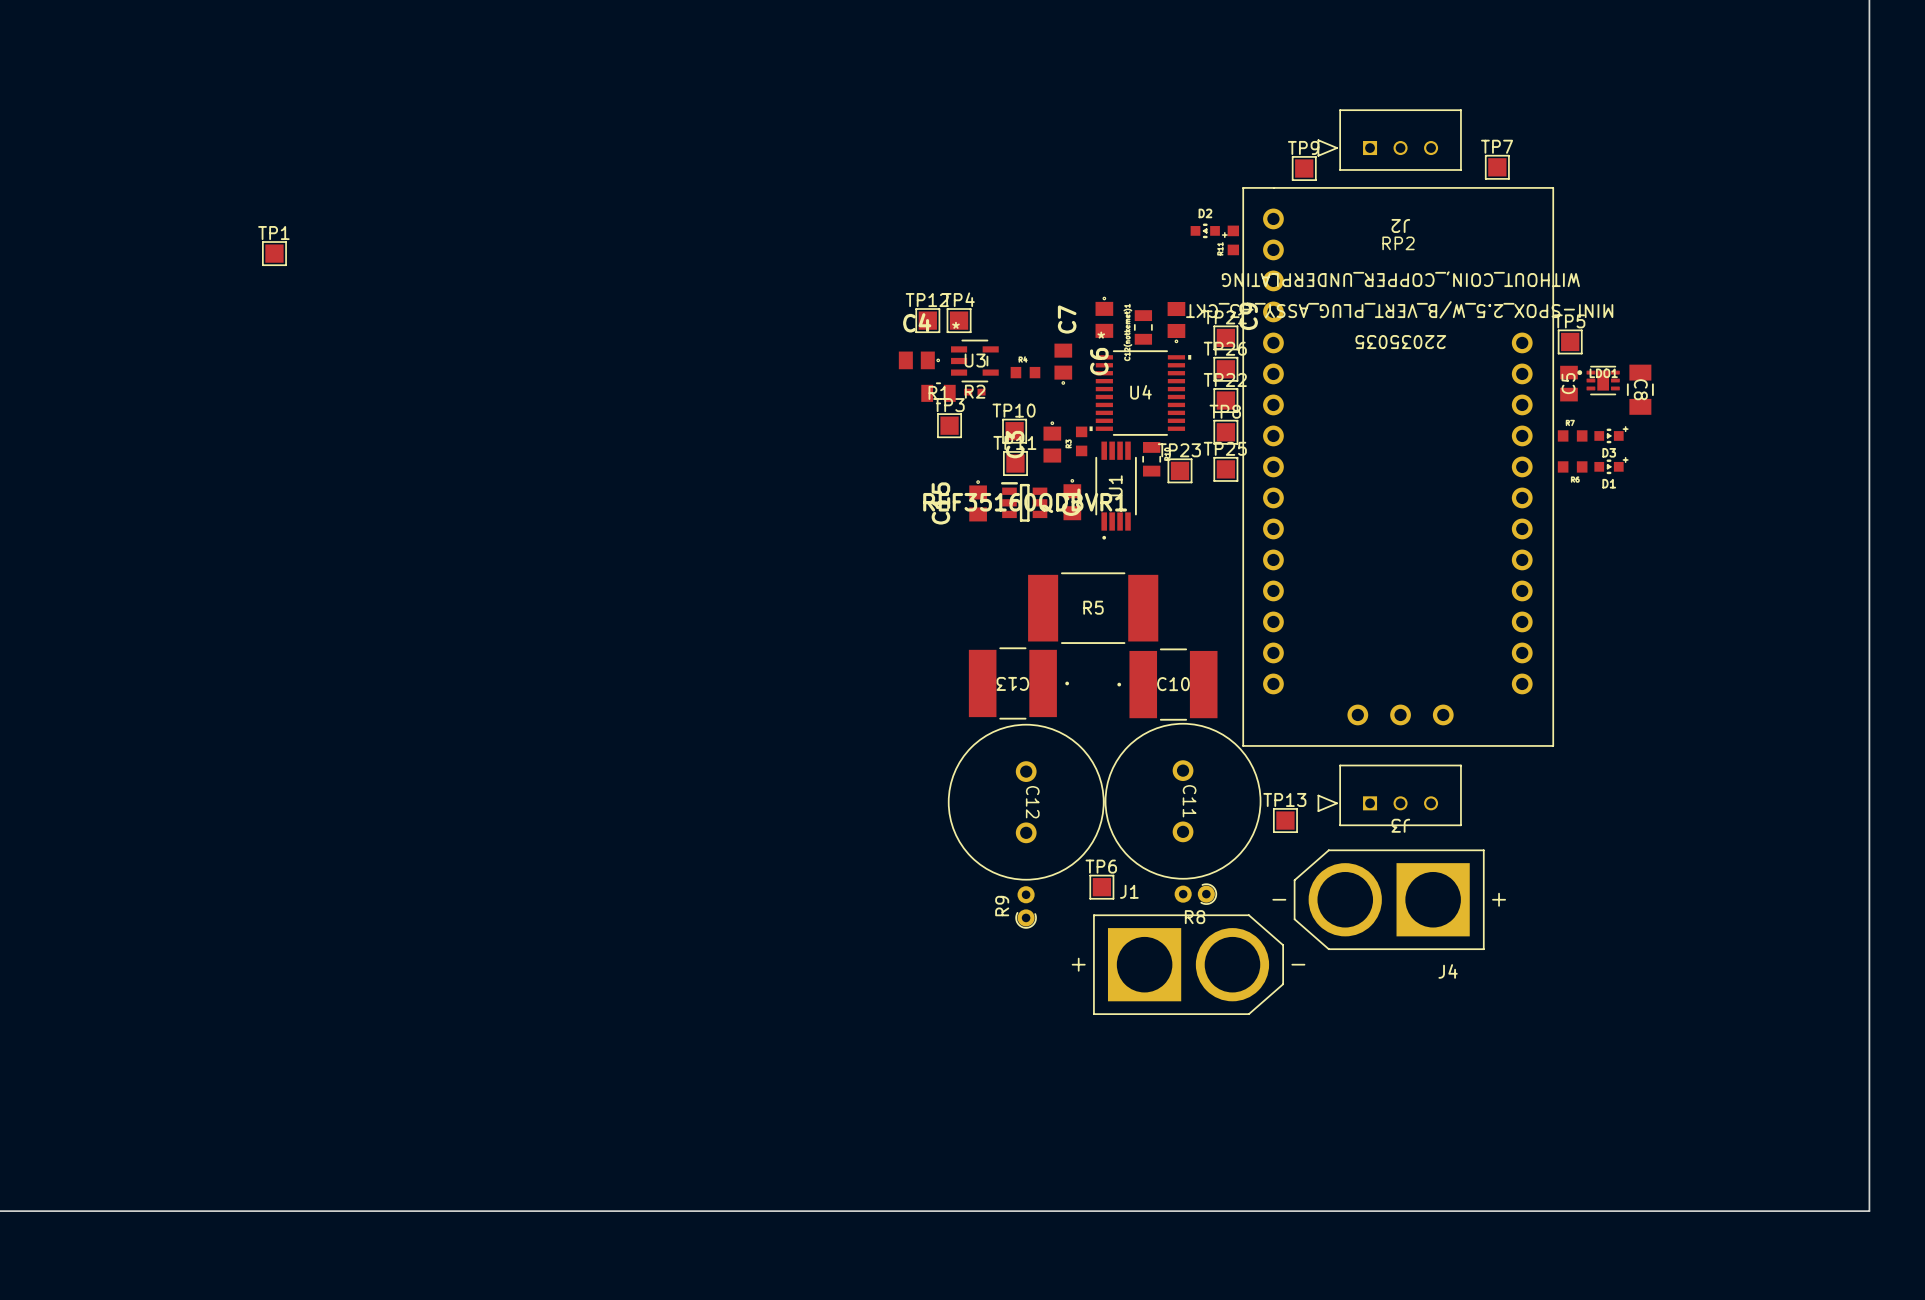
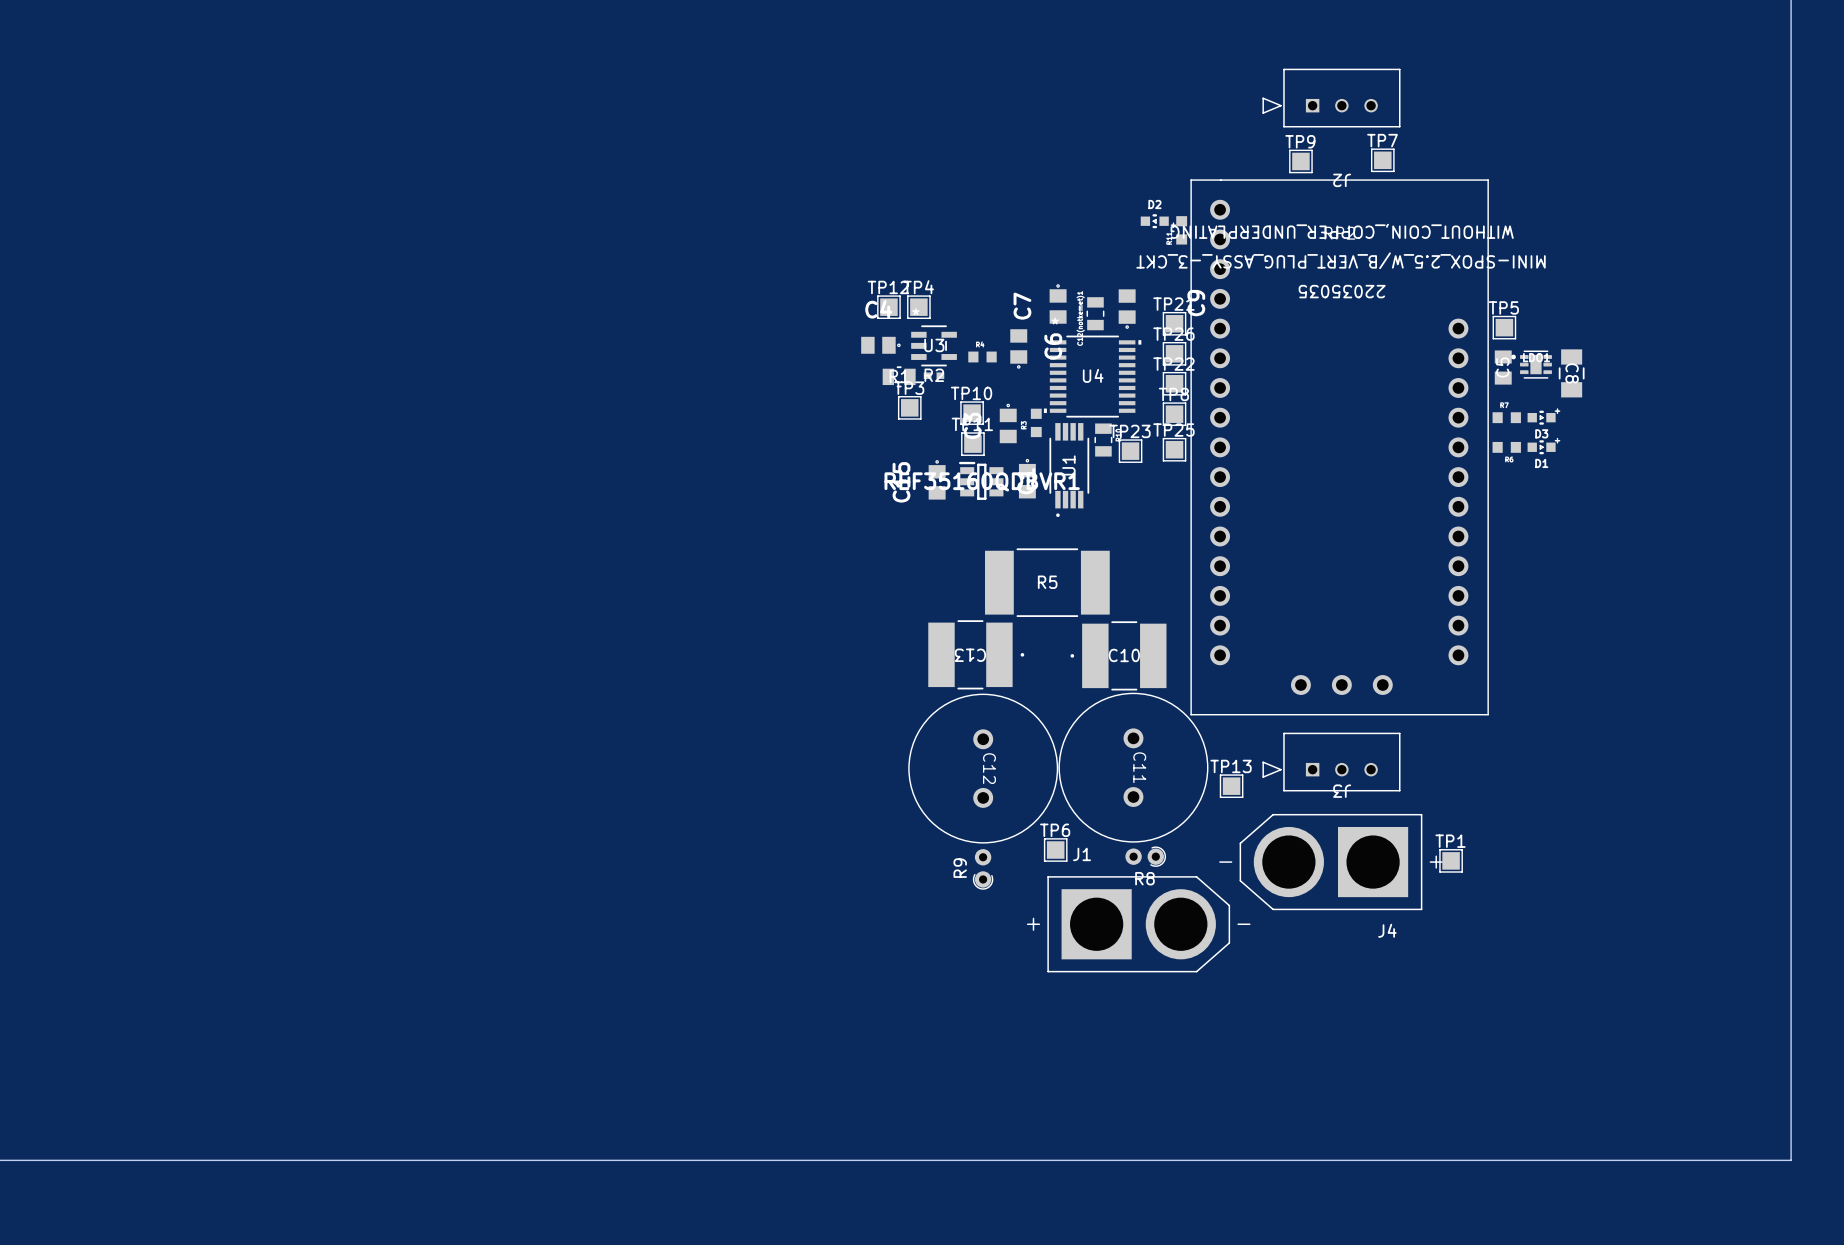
J2 position: (1389, 140) -> (1331, 98)
TP7 position: (1497, 167) -> (1382, 160)
TP9 position: (1304, 168) -> (1300, 161)
TP1 position: (274, 253) -> (1451, 860)

